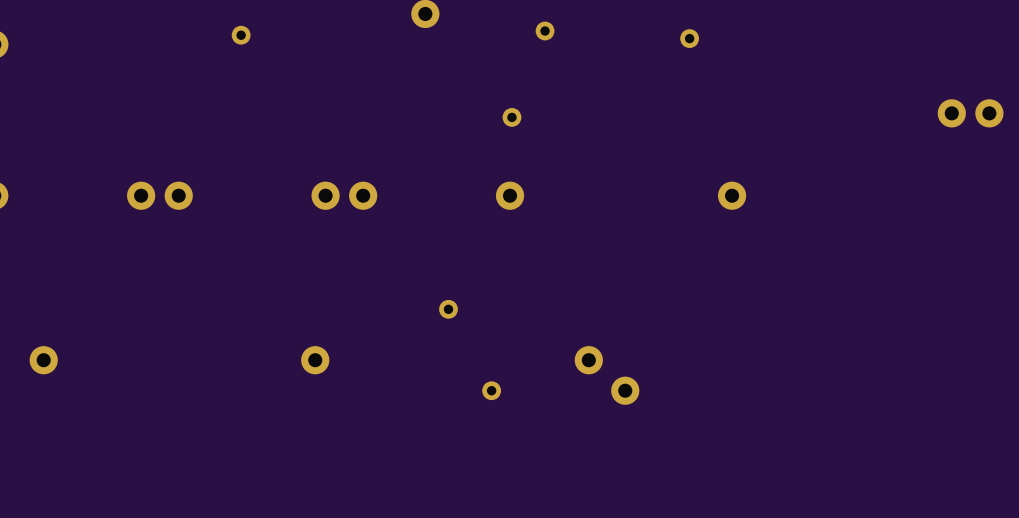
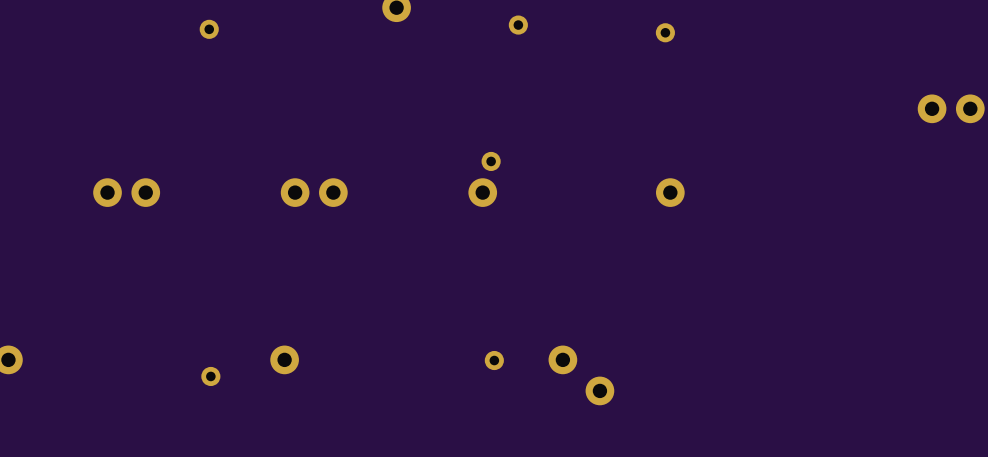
via position: (511, 117) -> (491, 161)
via position: (732, 195) -> (670, 192)
via: (448, 309) -> none
via: none -> (210, 376)
via position: (491, 390) -> (494, 360)

